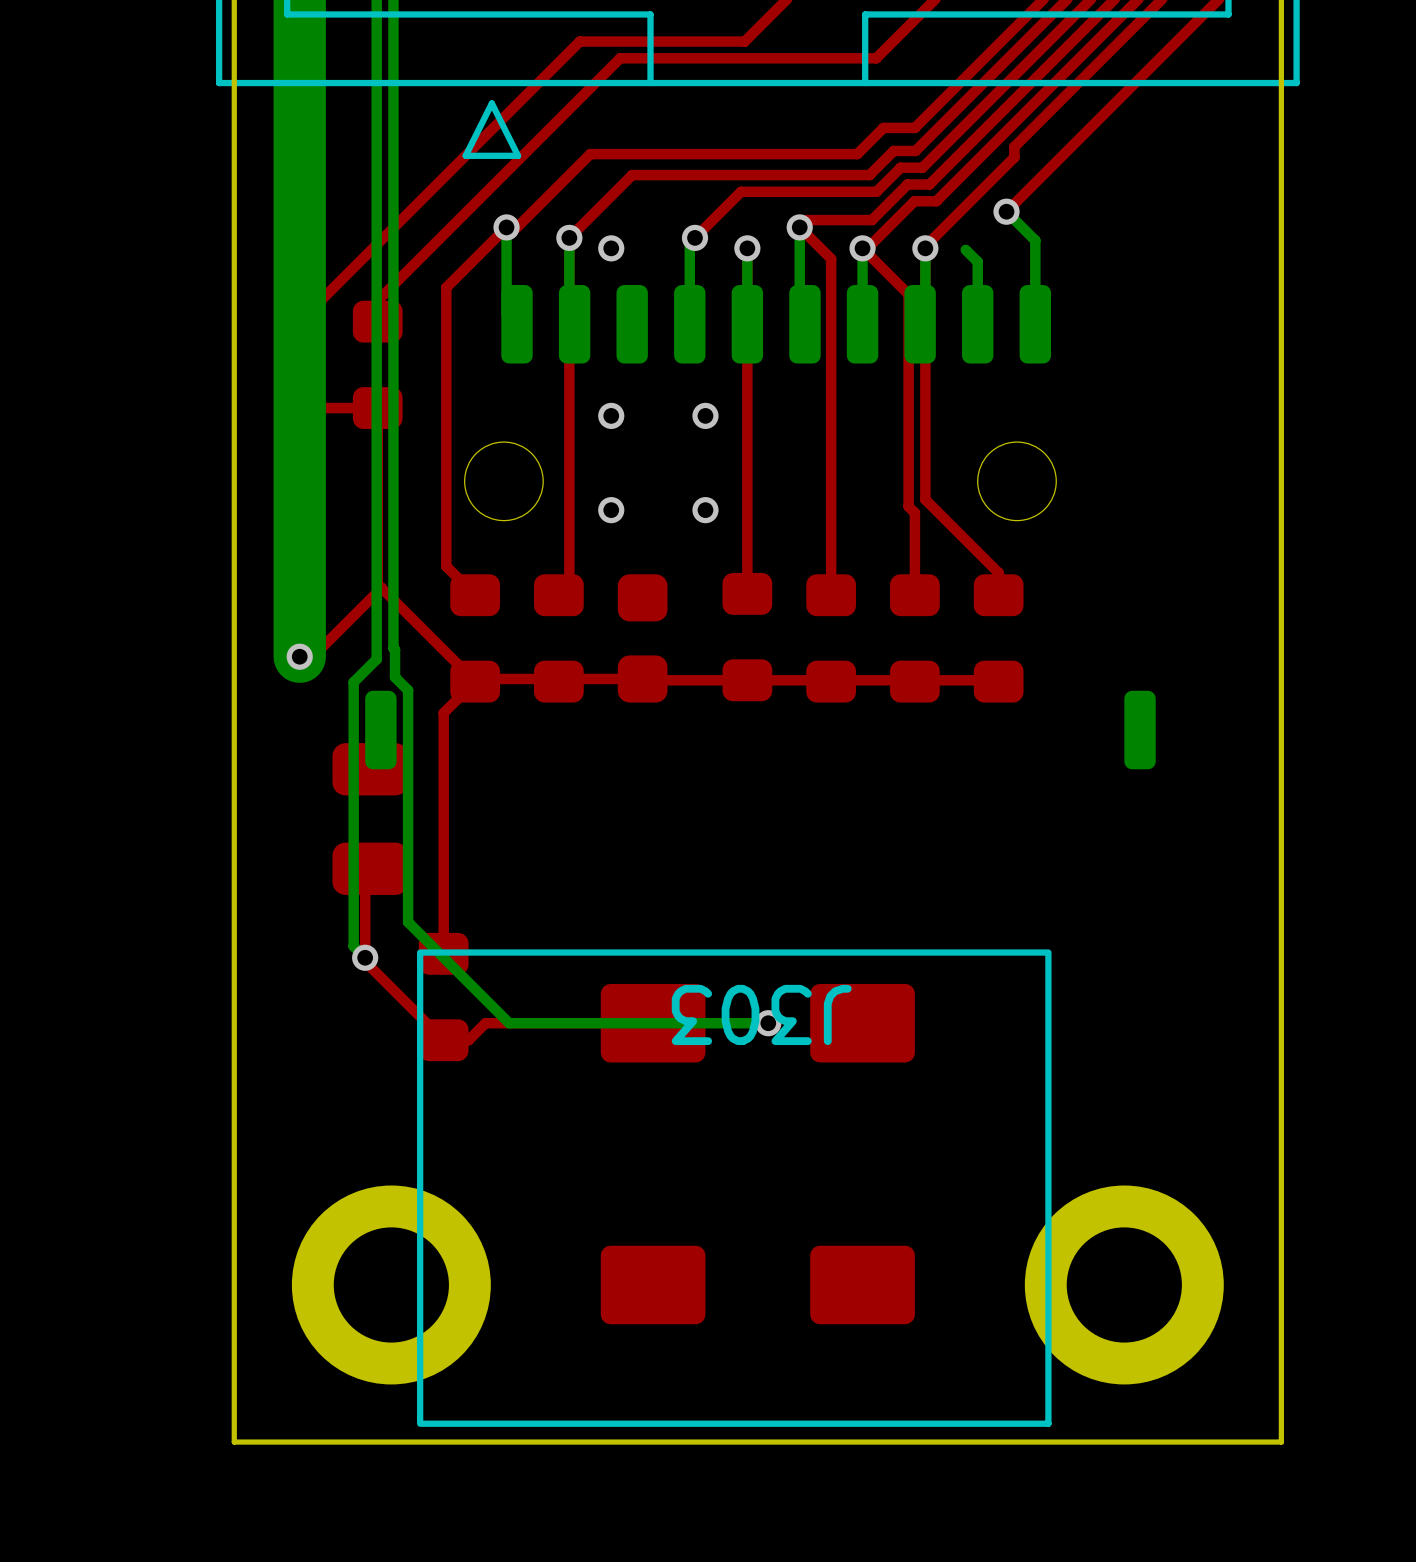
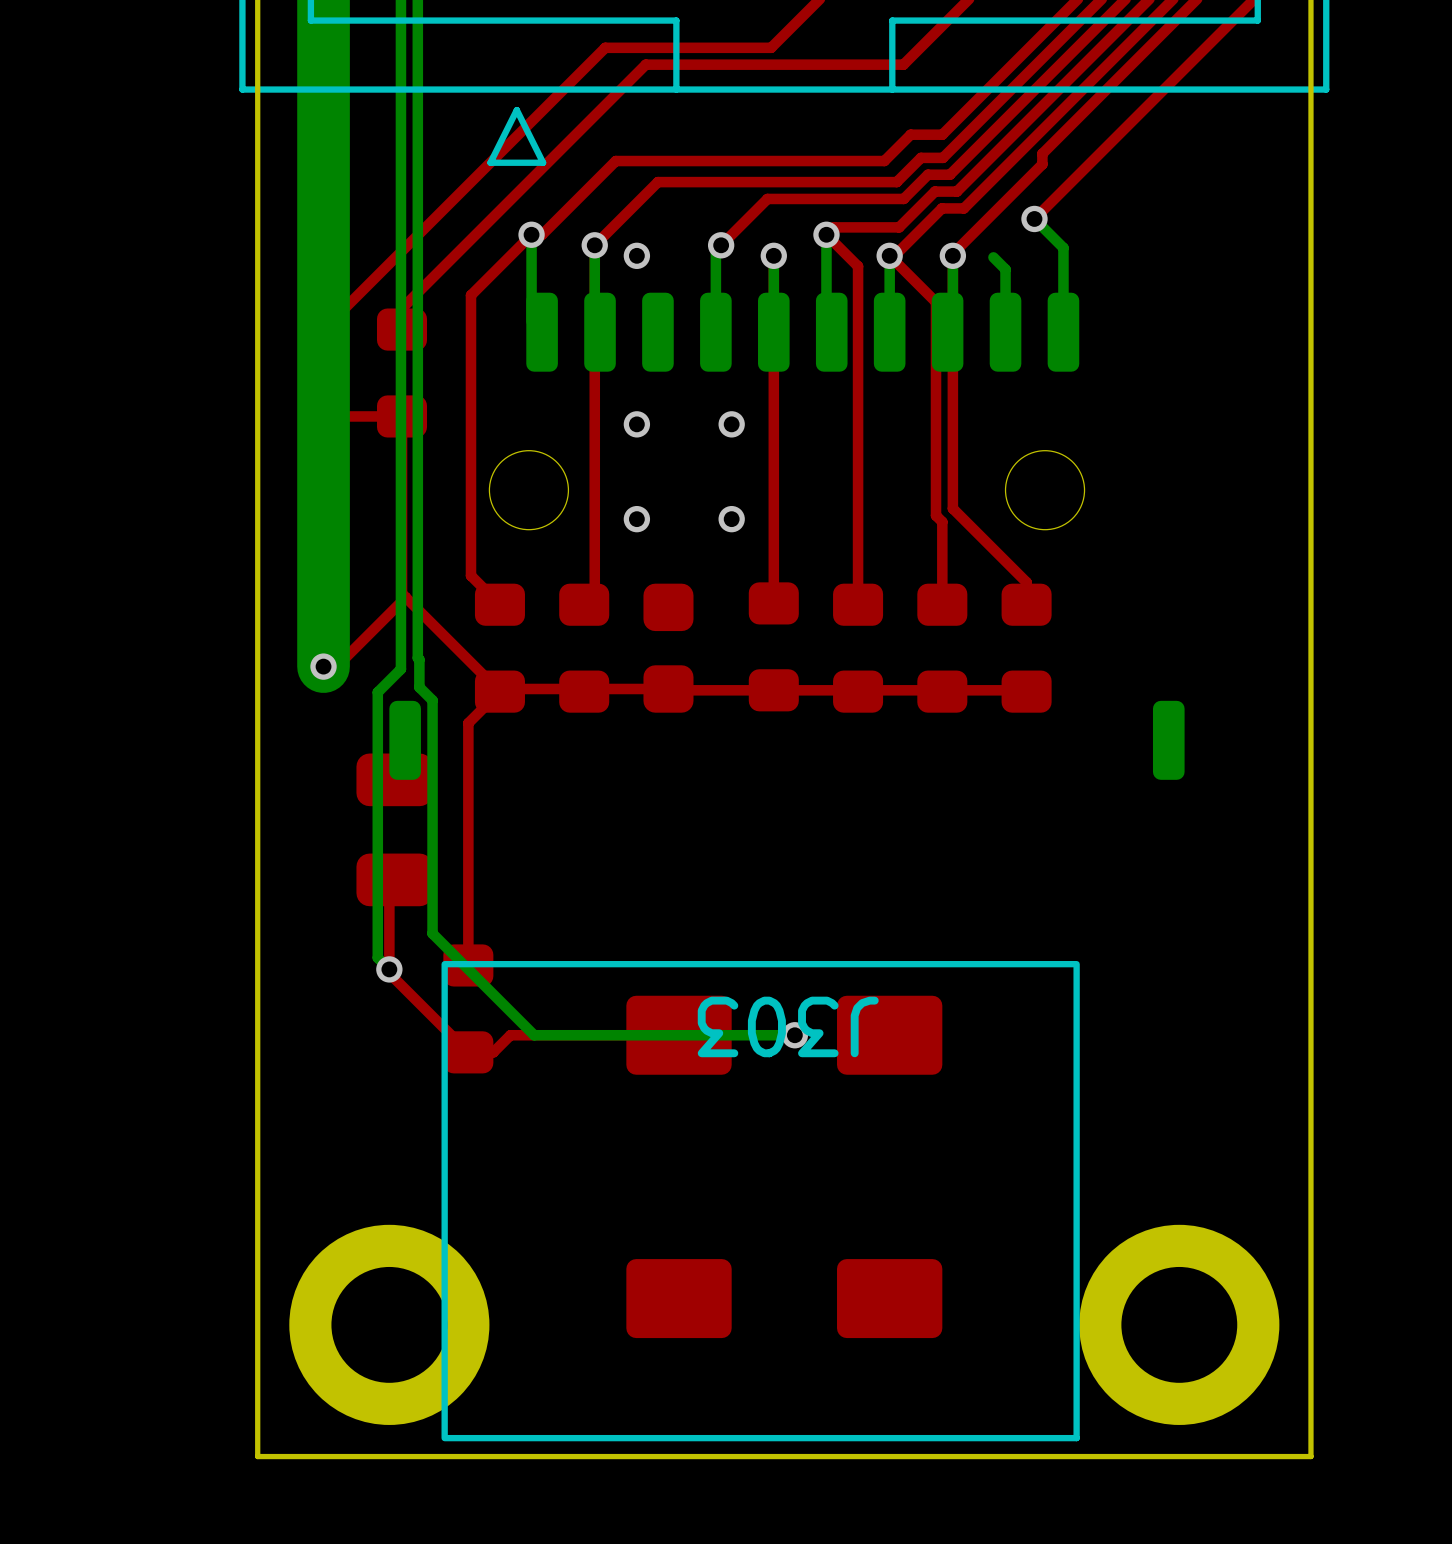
part position: (391, 1284) -> (389, 1324)
part position: (1124, 1284) -> (1179, 1324)

